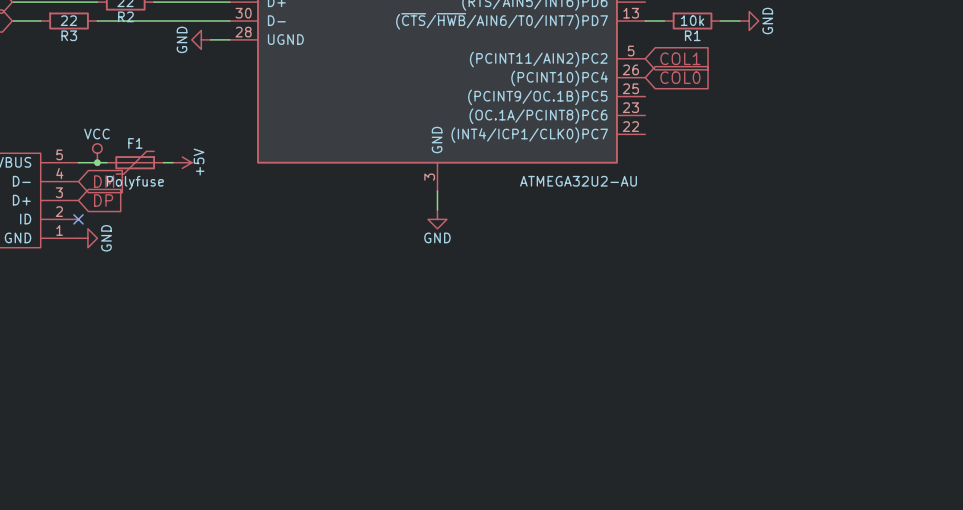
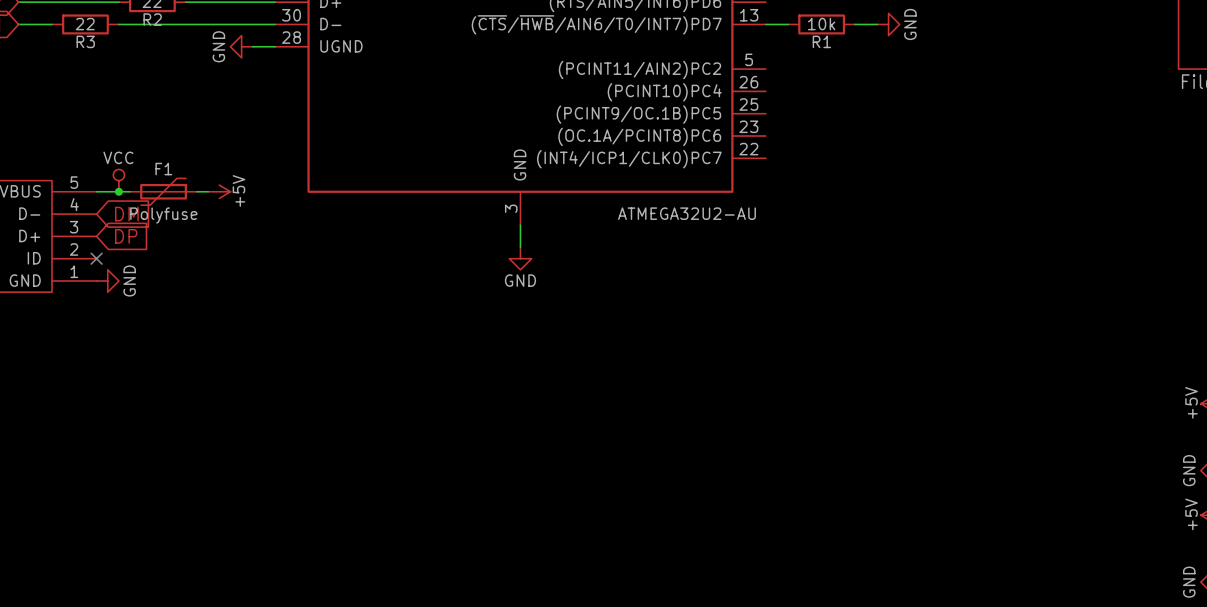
global label: COL1 (680, 58) -> none
global label: COL0 (680, 77) -> none

